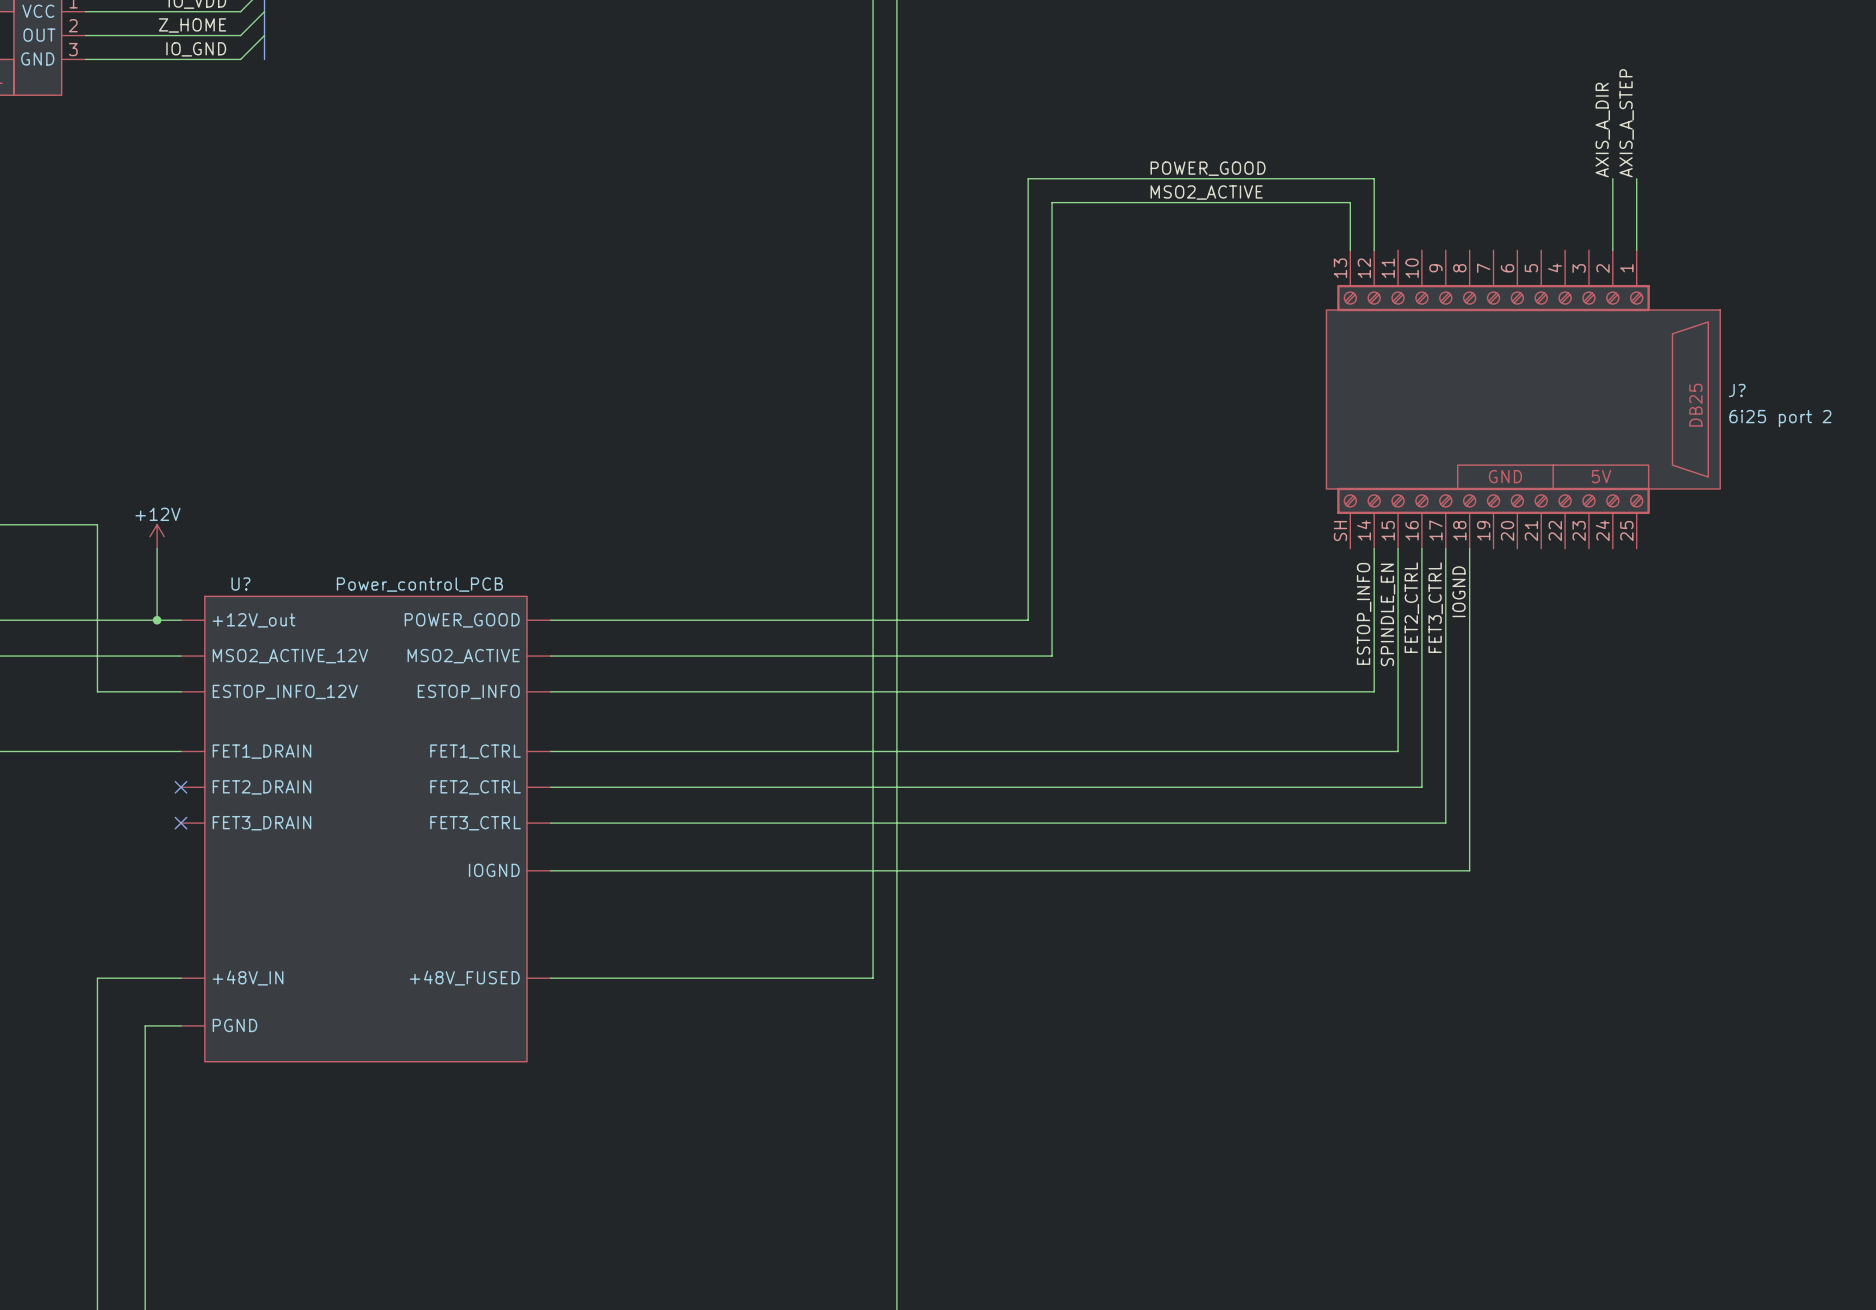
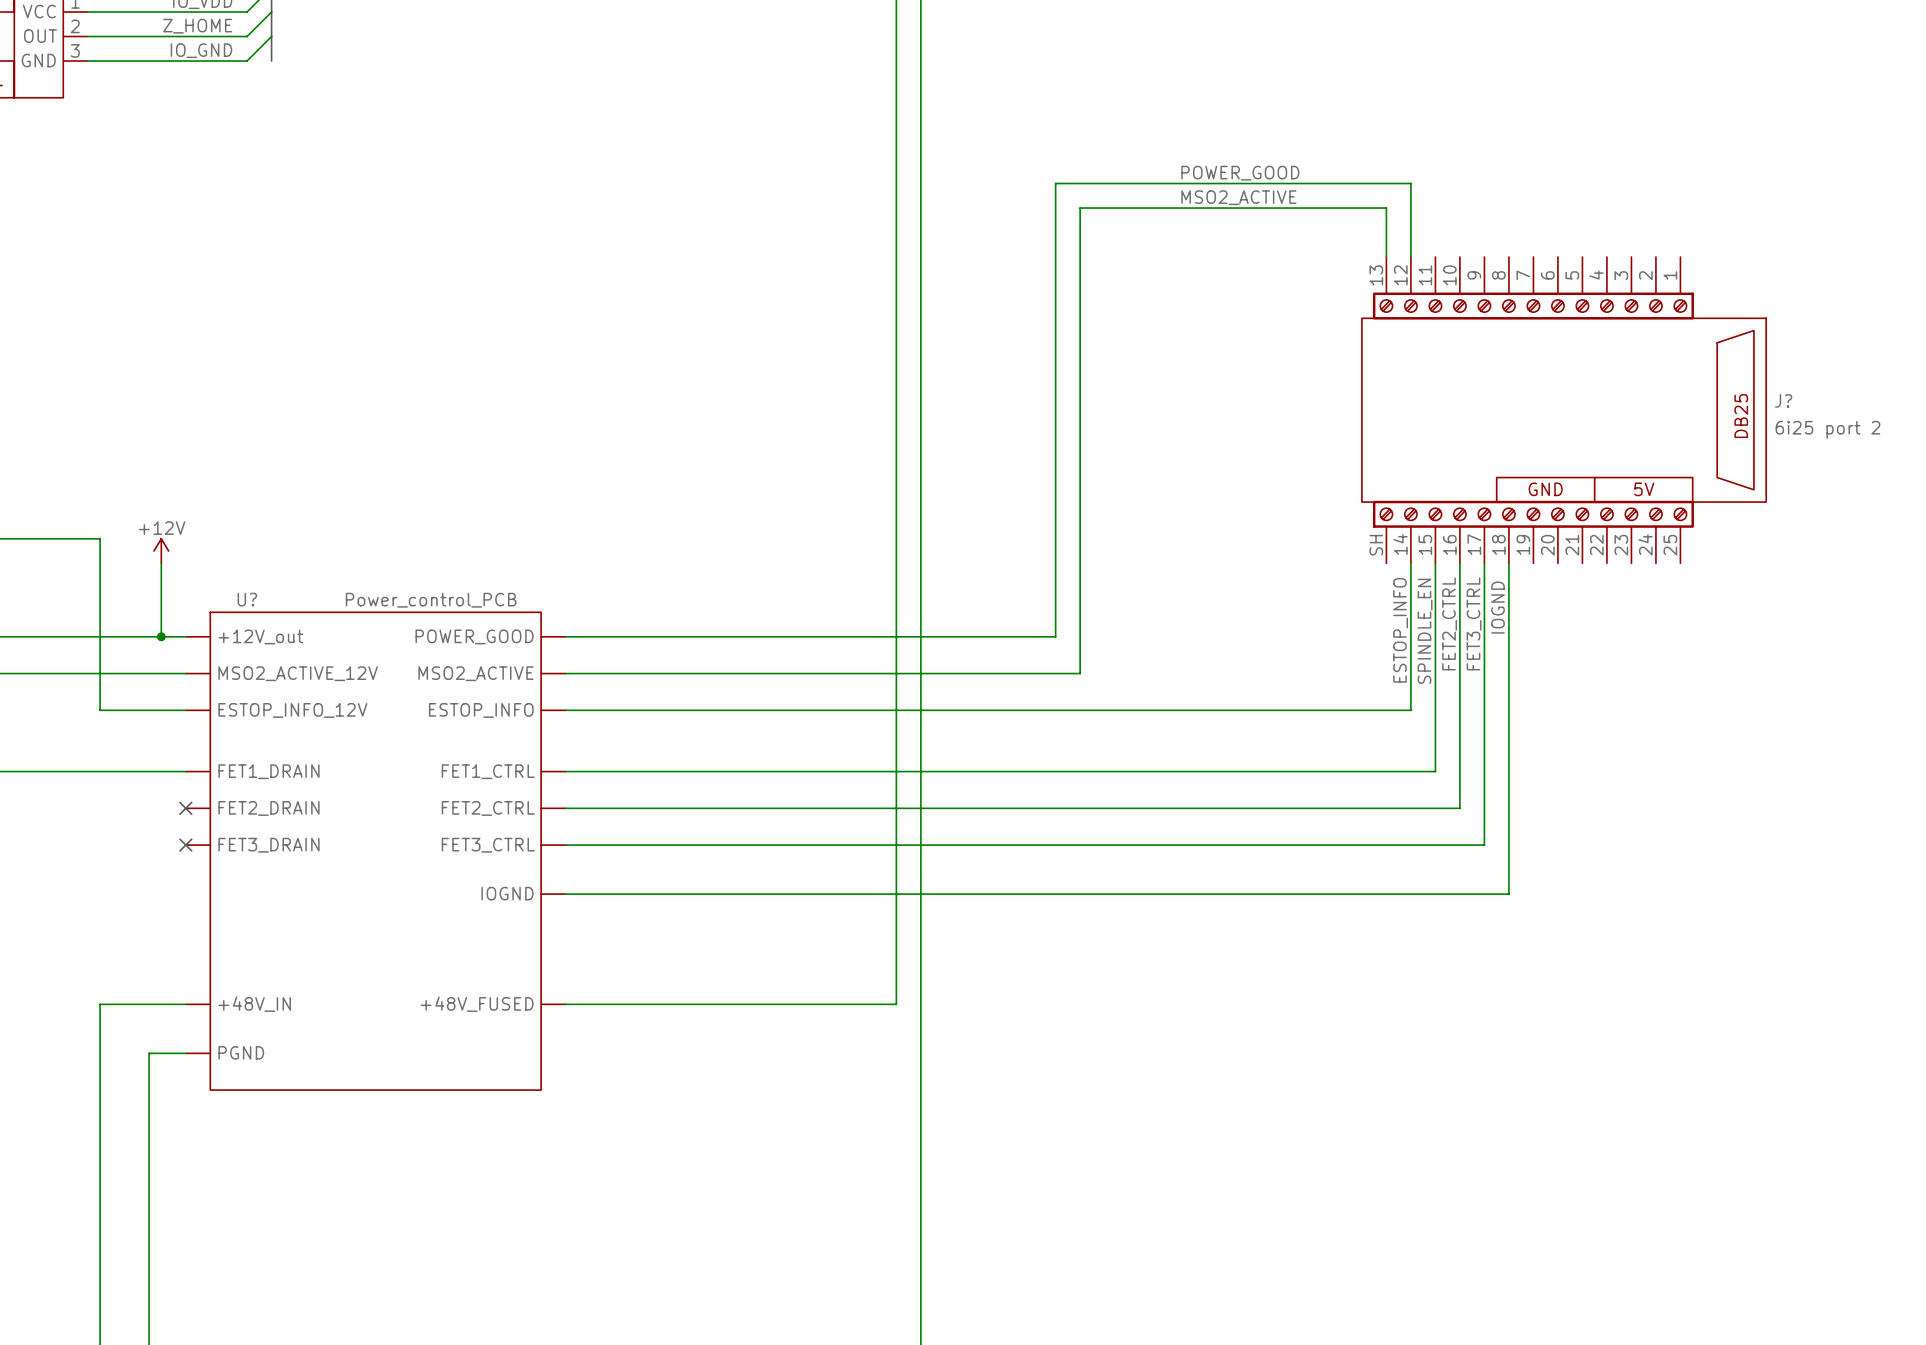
label: AXIS_A_STEP (1626, 123) -> none
label: AXIS_A_DIR (1602, 130) -> none
wire: (1612, 178) (1612, 250) -> none
wire: (1636, 178) (1636, 250) -> none

